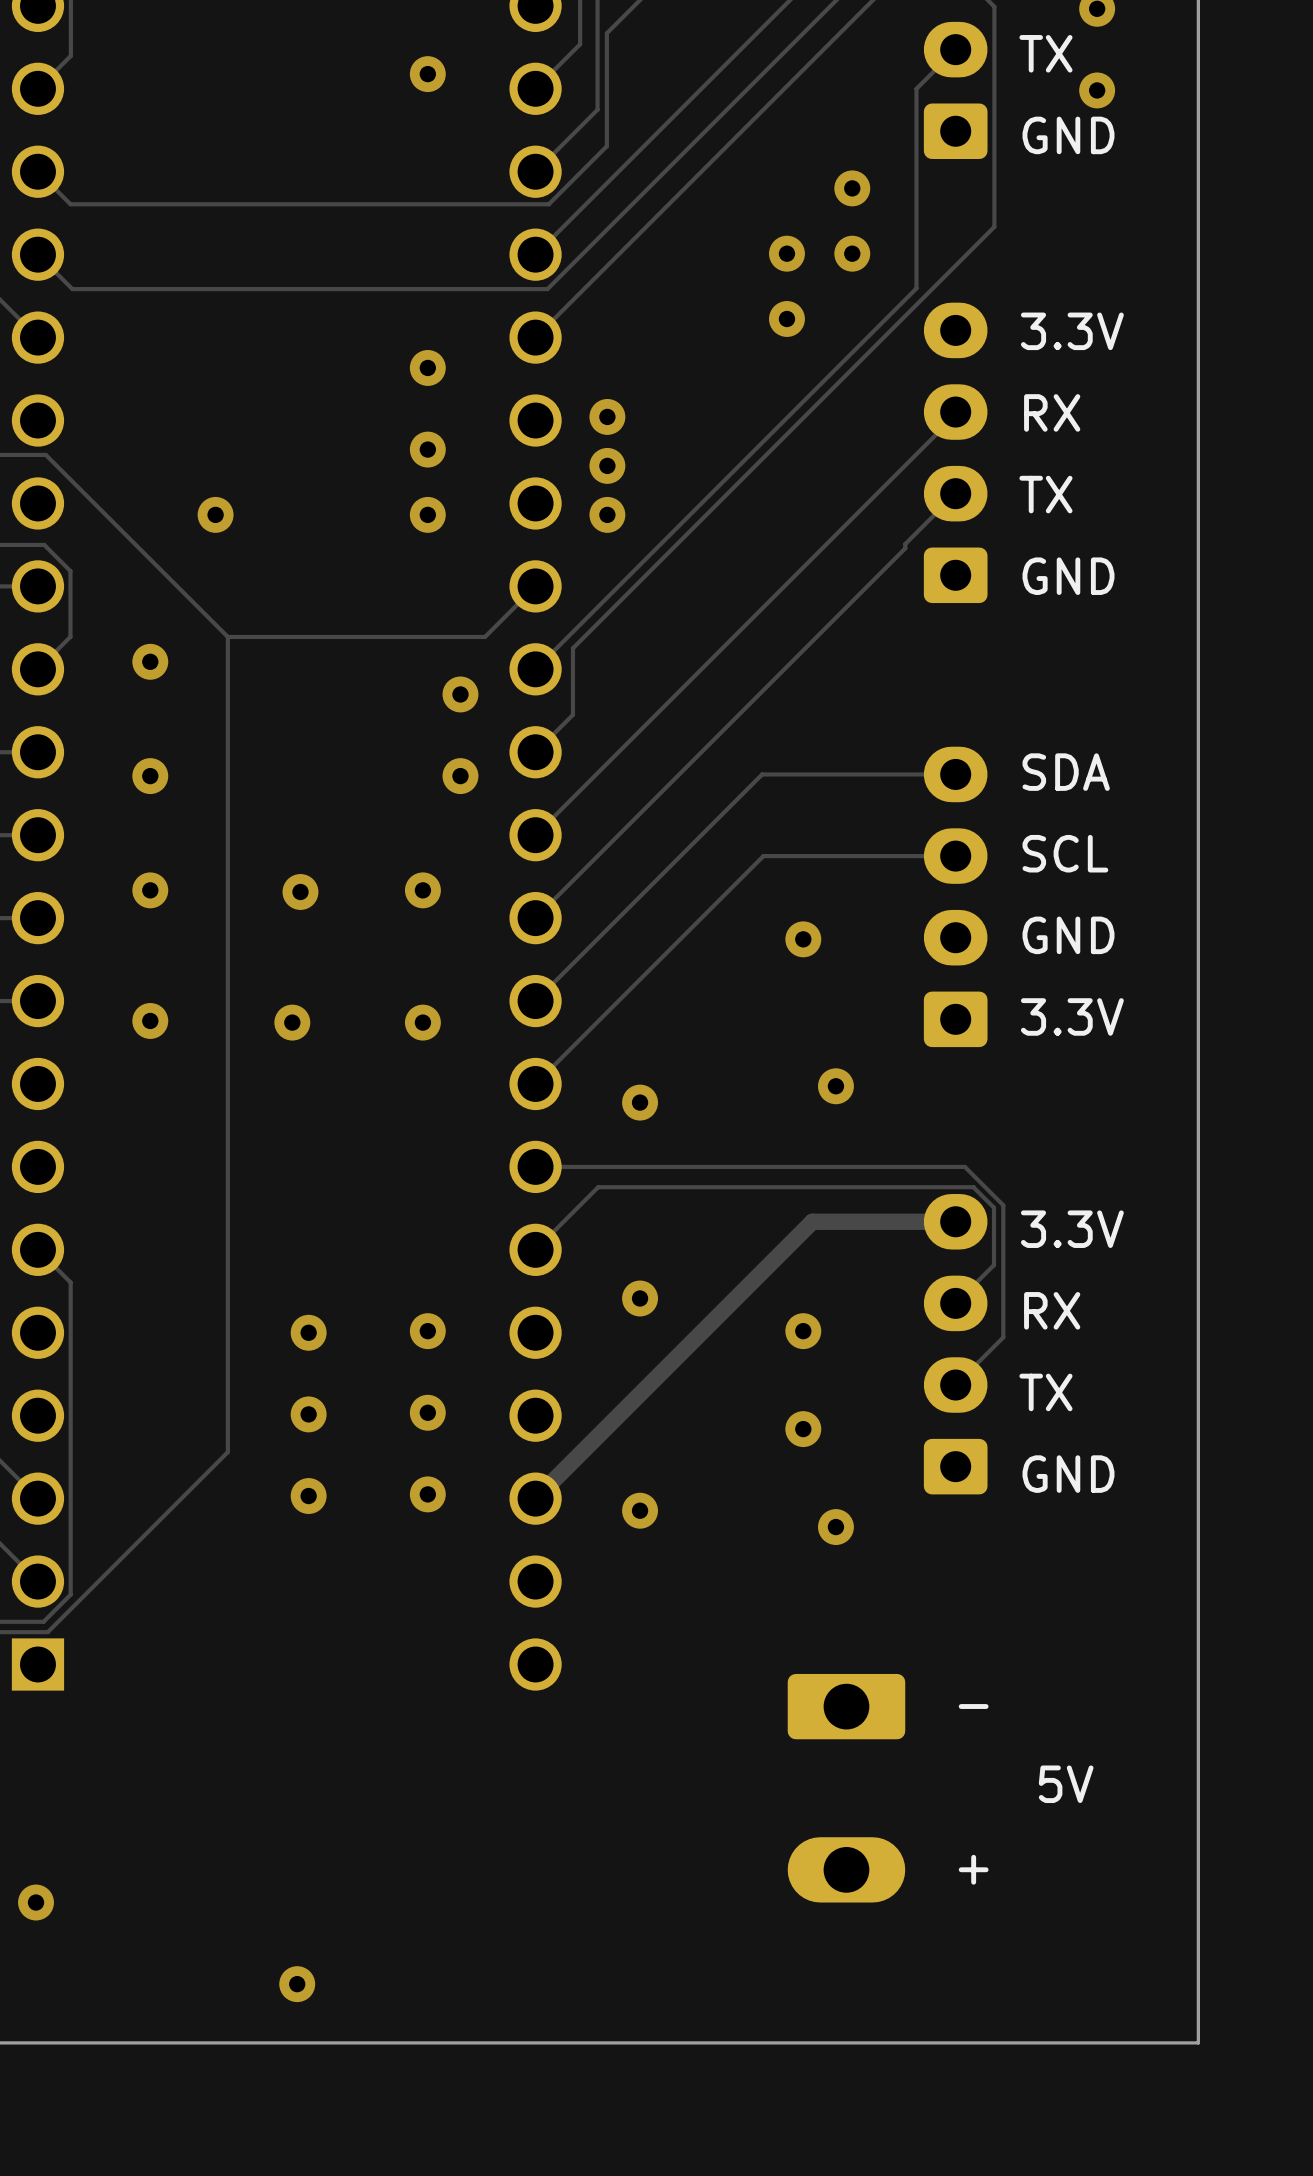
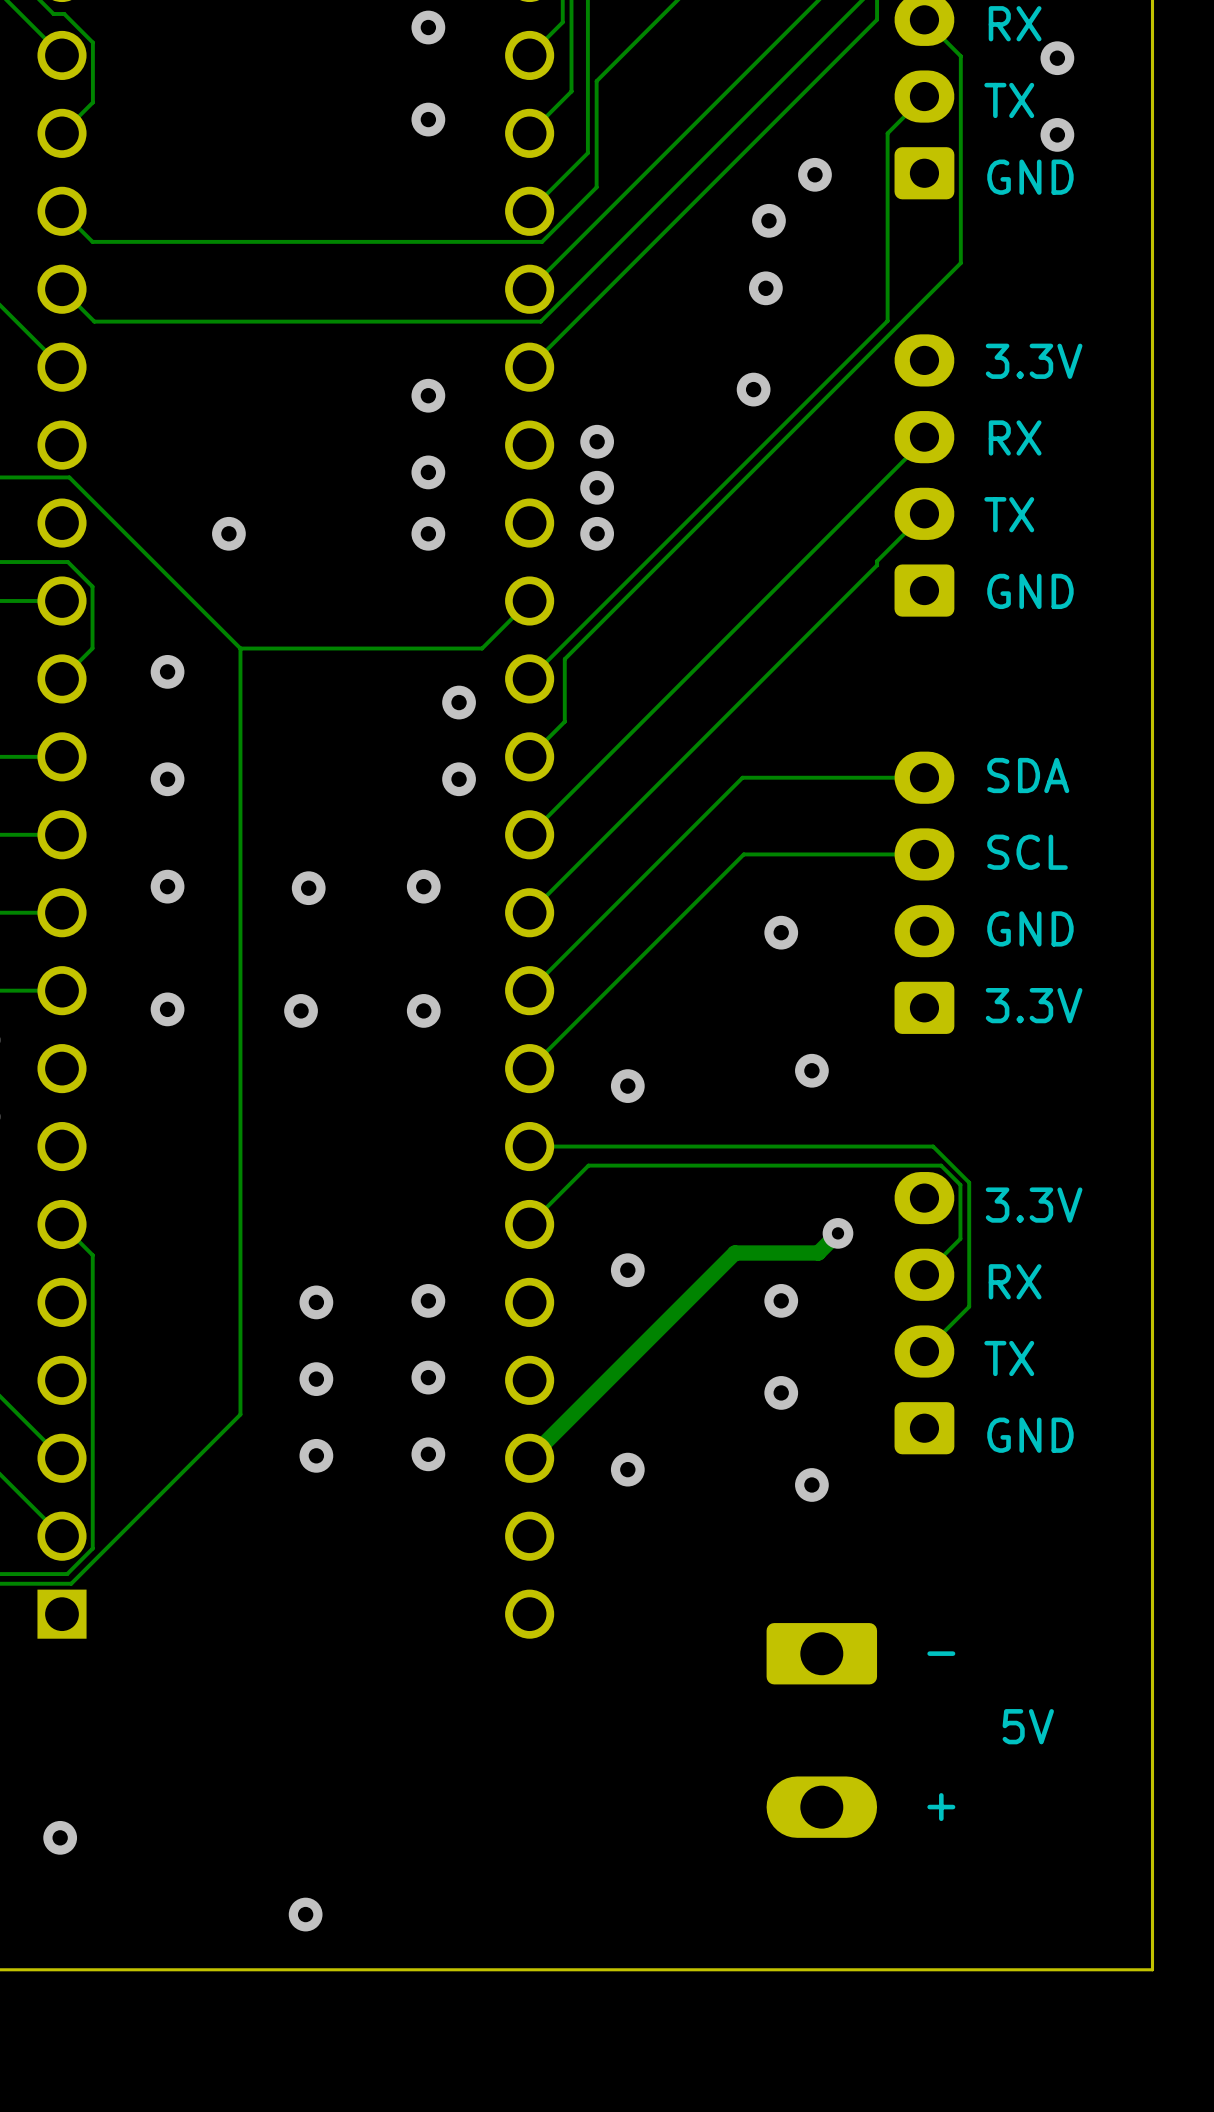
via: none -> (814, 174)
via: none -> (768, 220)
via: (852, 188) -> none
via: (852, 253) -> none
via position: (786, 318) -> (753, 389)
track: (955, 1221) (812, 1221) (753, 1280) -> (837, 1233) (818, 1253) (734, 1253)
via: none -> (837, 1233)

